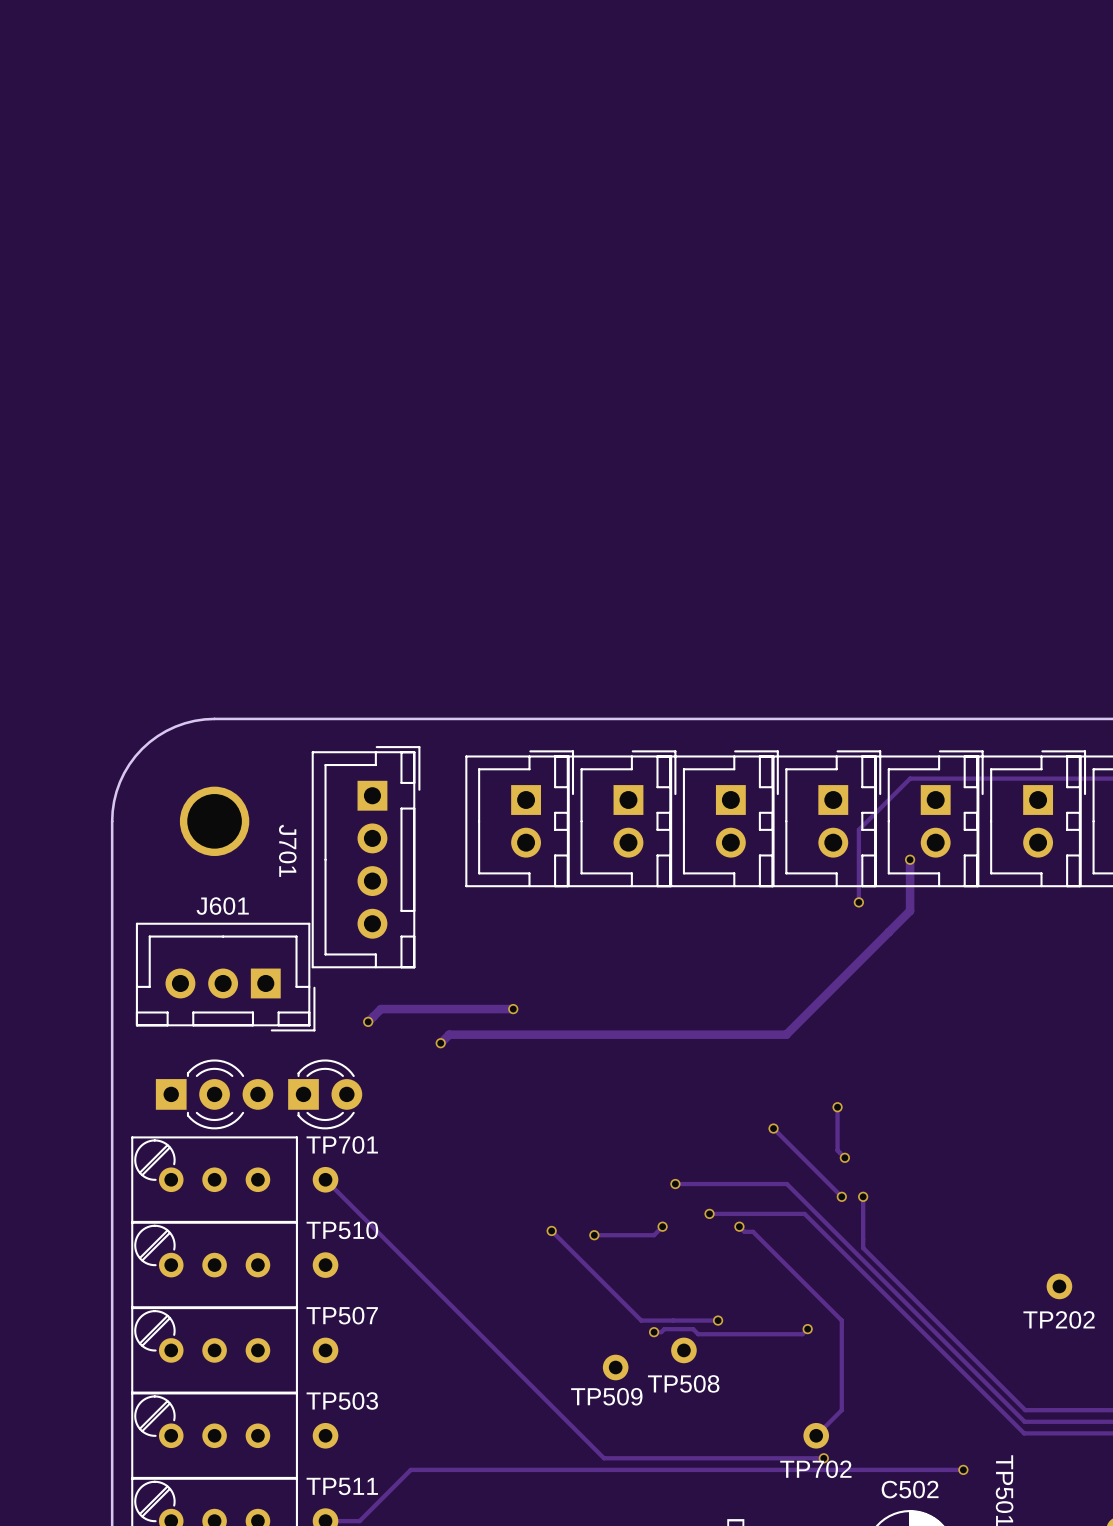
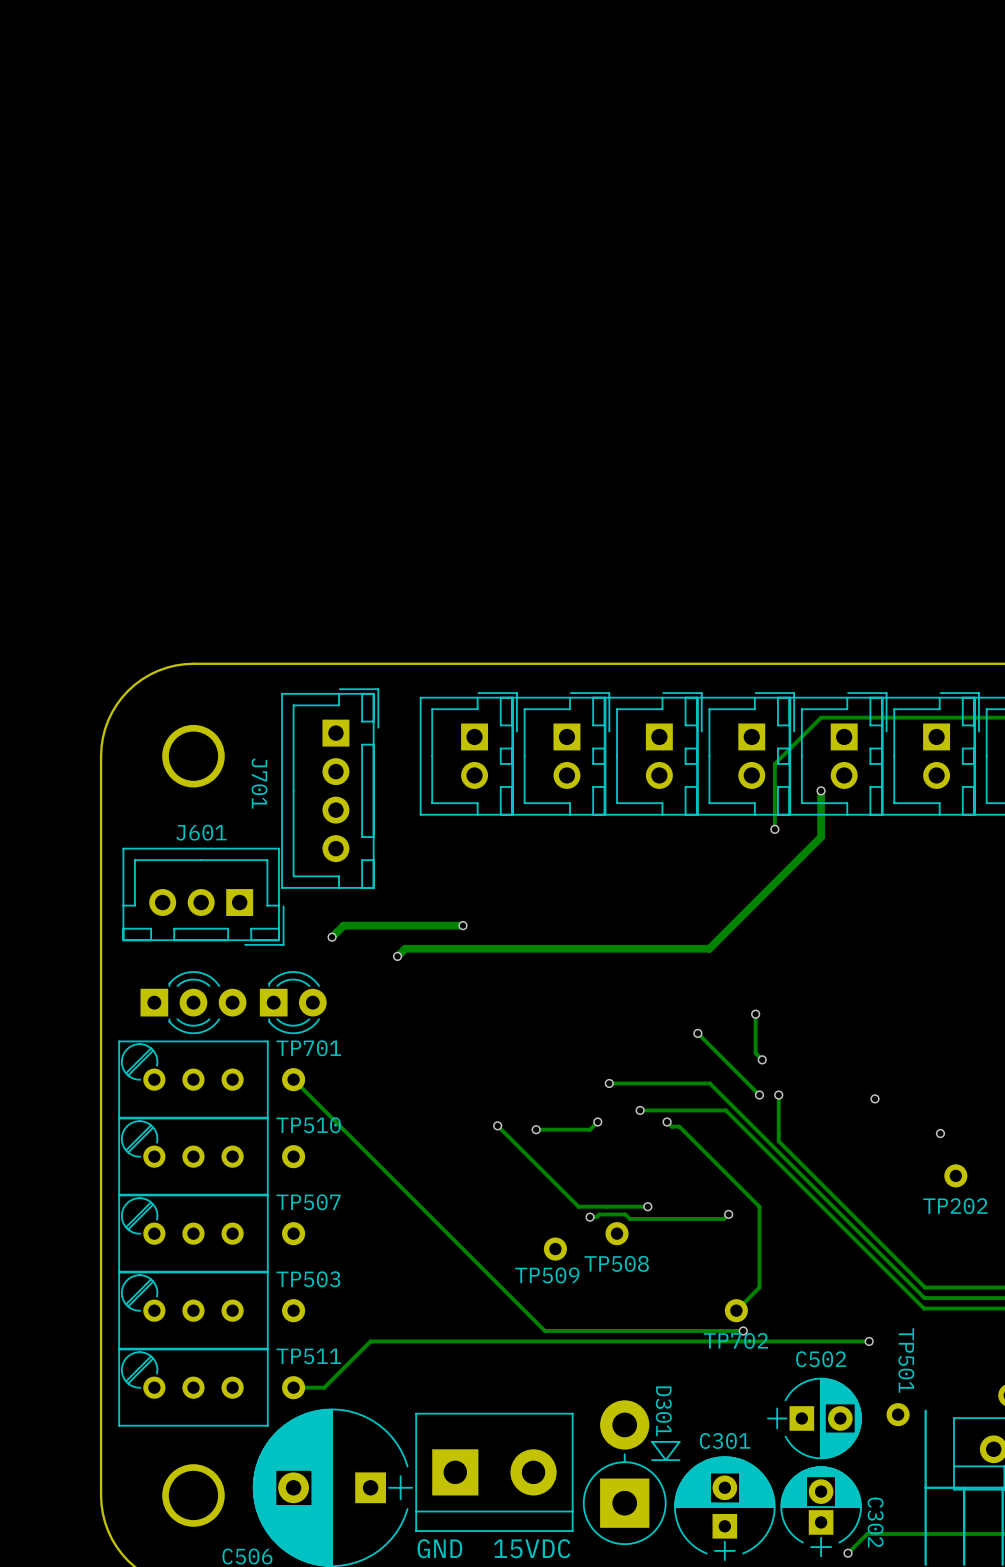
via: none -> (874, 1098)
via: none -> (940, 1133)

